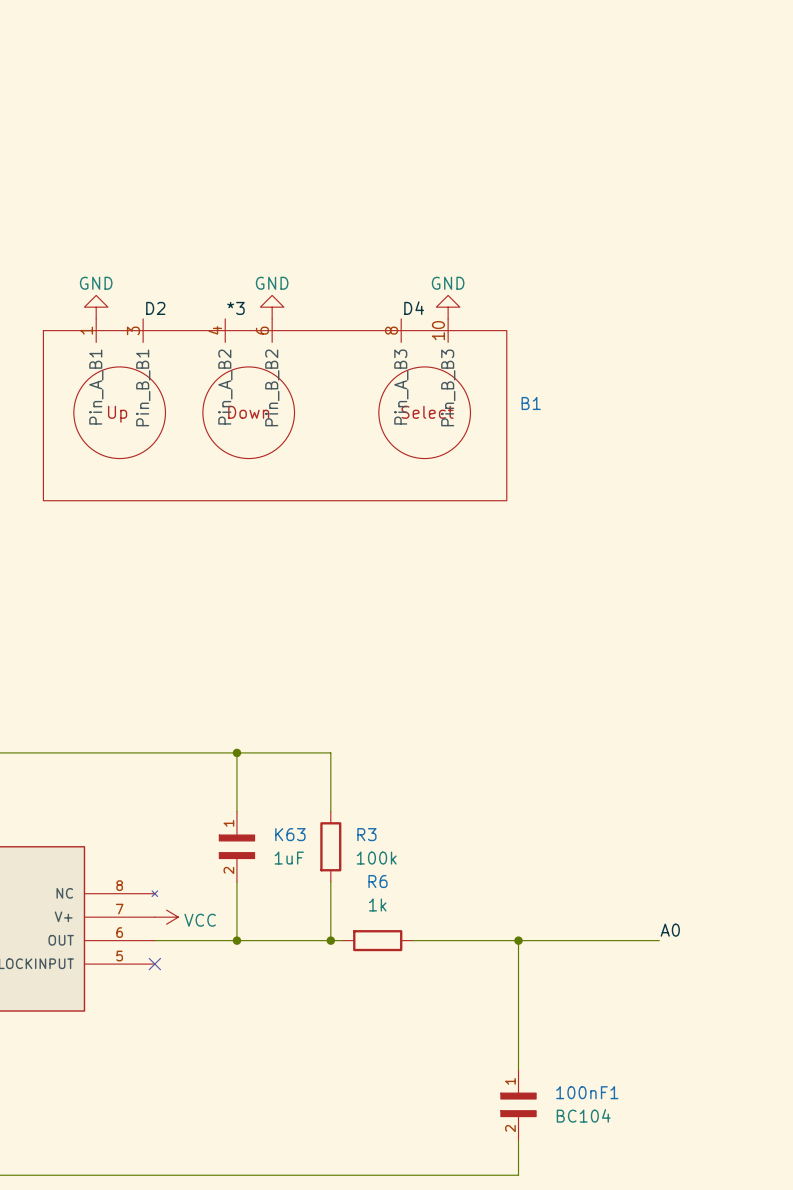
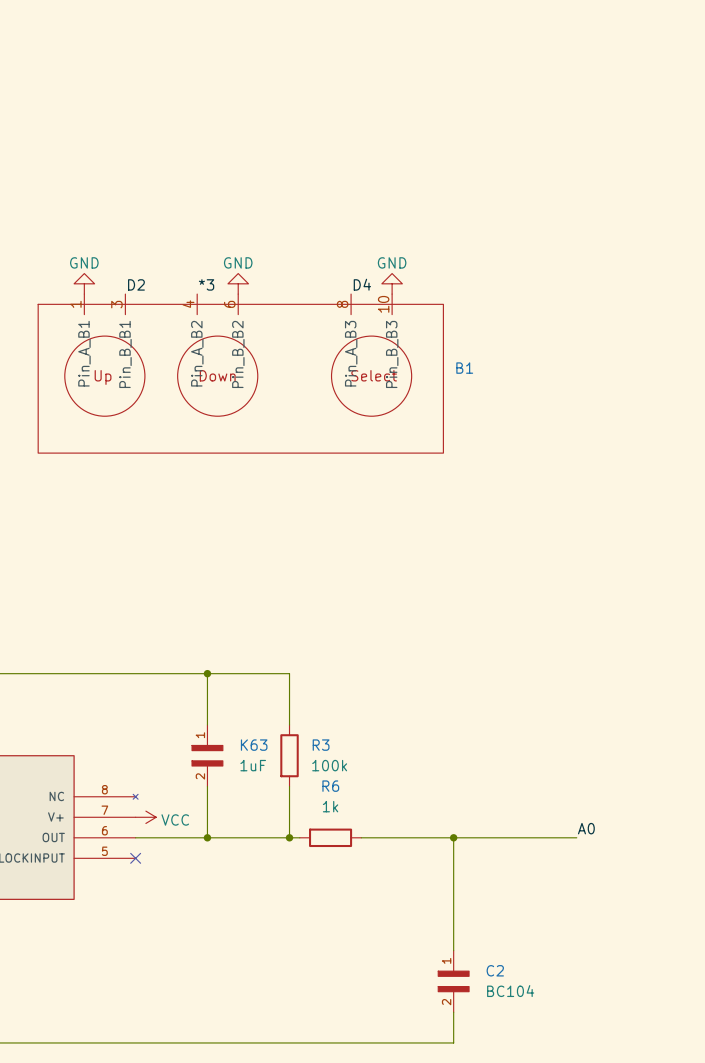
100nF1 name: 100nF1 (587, 1092) -> C2 (495, 970)

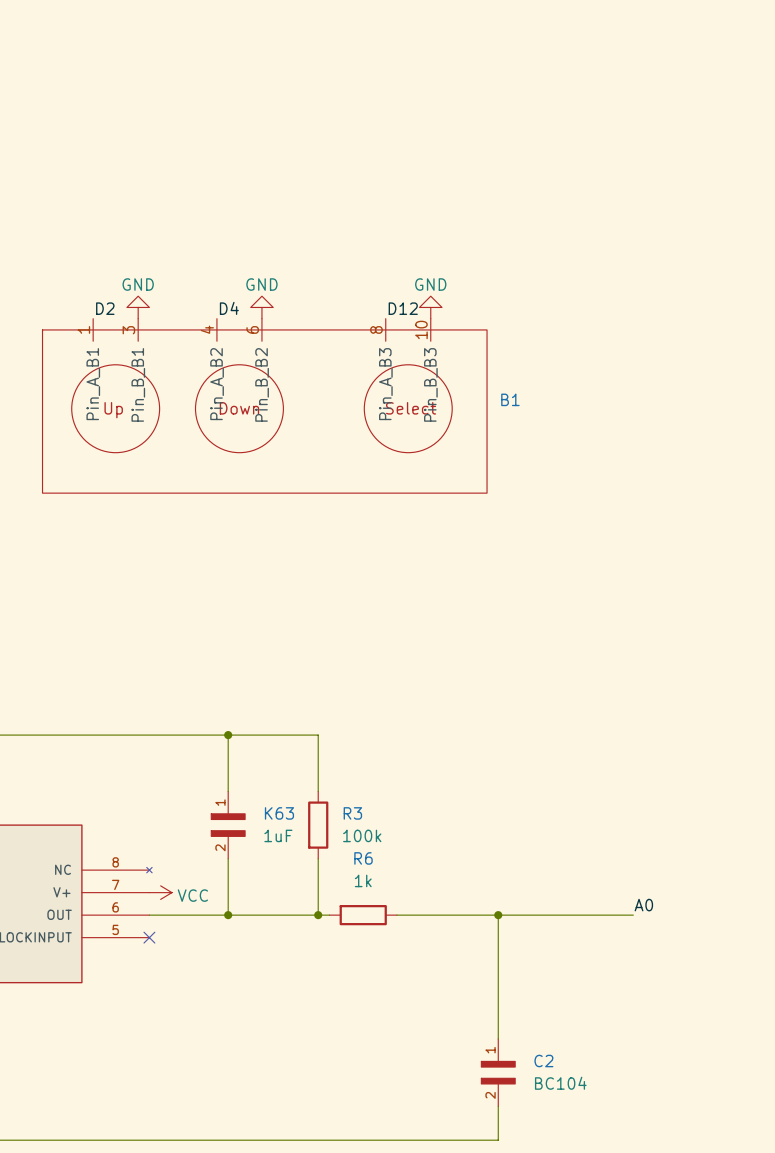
power symbol position: GND (84, 283) -> GND (138, 307)
label position: D2 (136, 284) -> D2 (105, 308)
label: *3 (206, 284) -> D4 (229, 308)
label: D4 (362, 284) -> D12 (403, 308)

